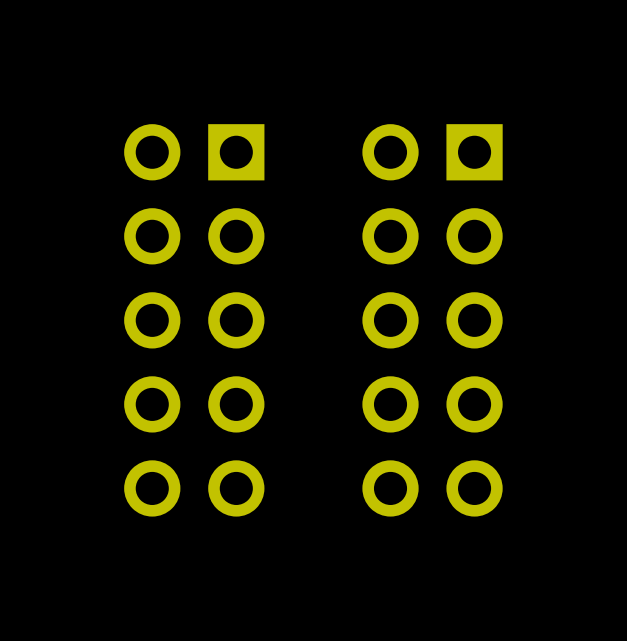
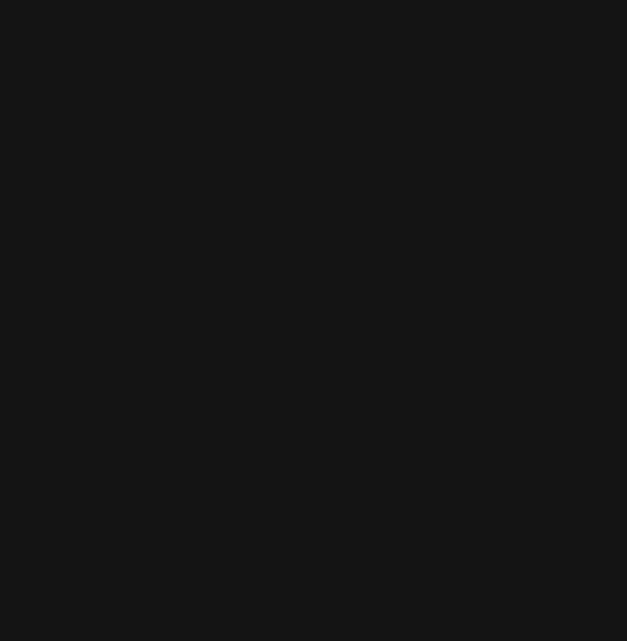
part: (194, 320) -> none
part: (432, 320) -> none

